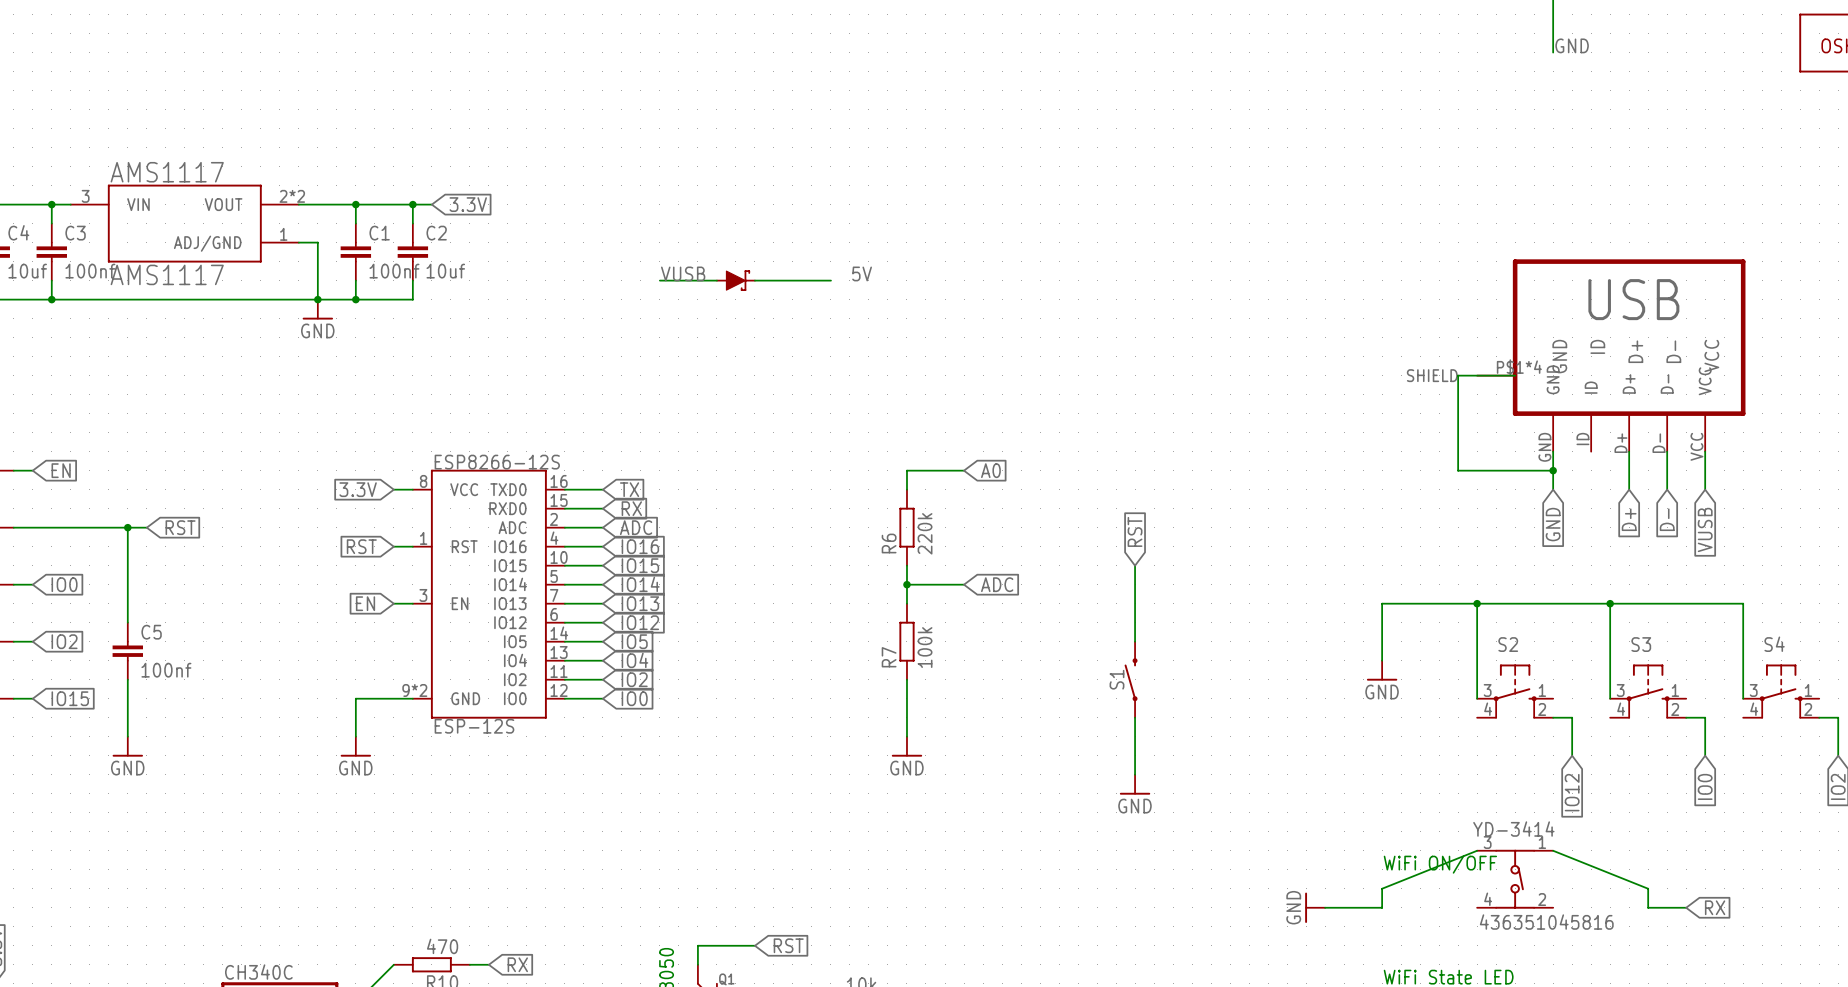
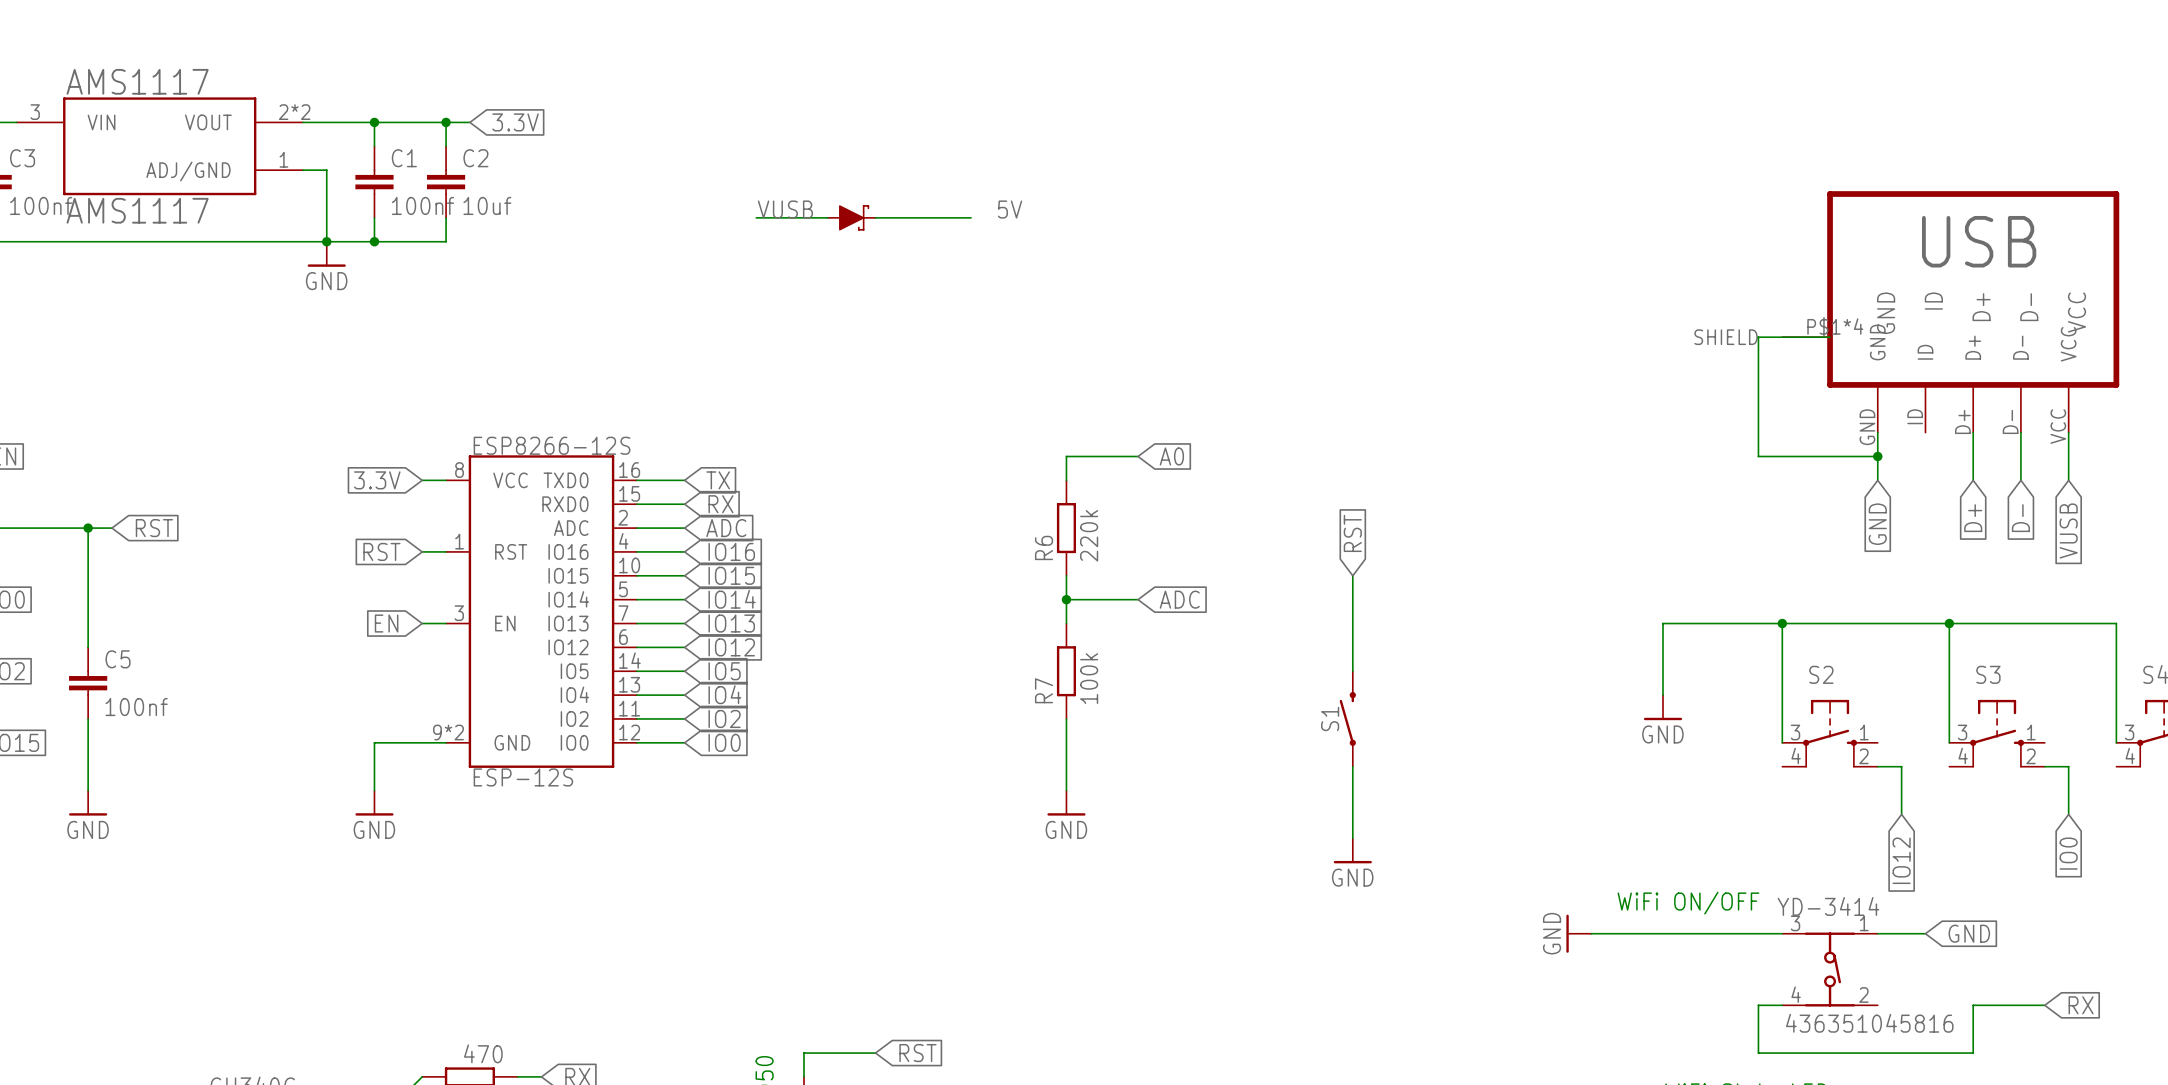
wire: (1477, 850) (1382, 888) (1382, 907) (1325, 907) -> (1782, 933) (1591, 933)
wire: (1553, 850) (1648, 888) (1648, 907) -> (1877, 933) (1925, 933)
global label: none -> GND (1969, 933)
text position: WiFi ON/OFF (1440, 864) -> WiFi ON/OFF (1688, 903)
power symbol position: GND (1315, 907) -> GND (1578, 933)
wire: none -> (1782, 1005) (1758, 1005) (1758, 1053) (1973, 1053) (1973, 1005) (1997, 1005)

